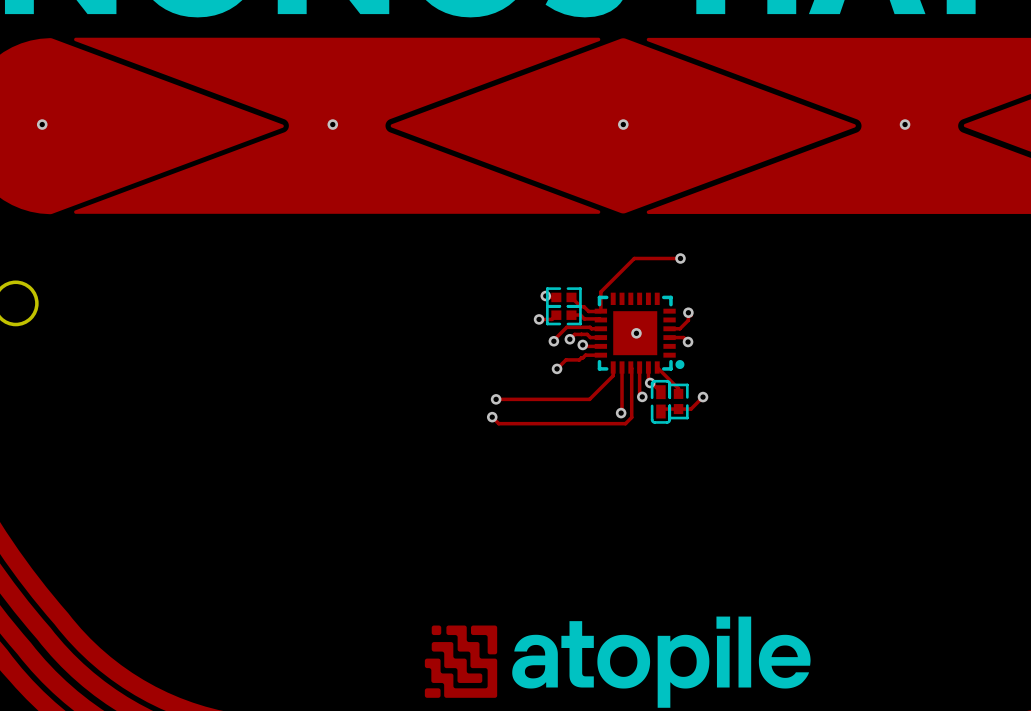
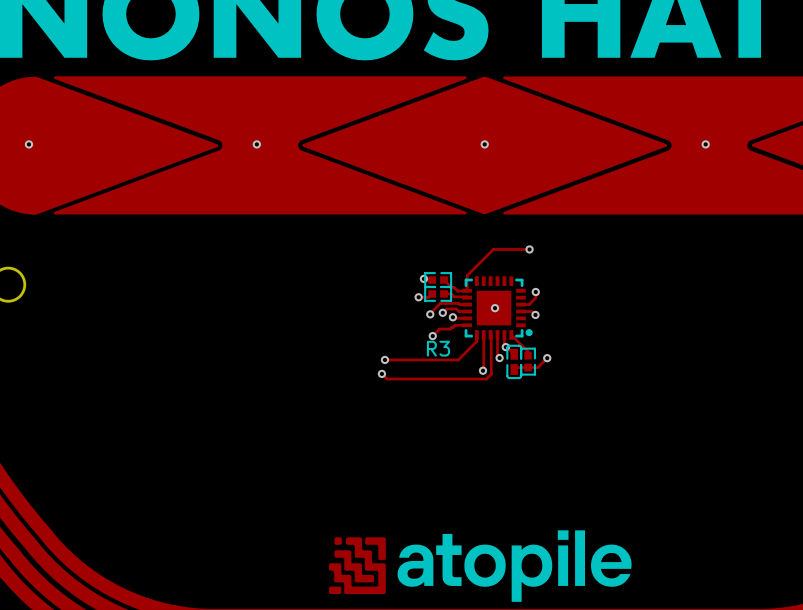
R3 name: none -> R3 (438, 348)

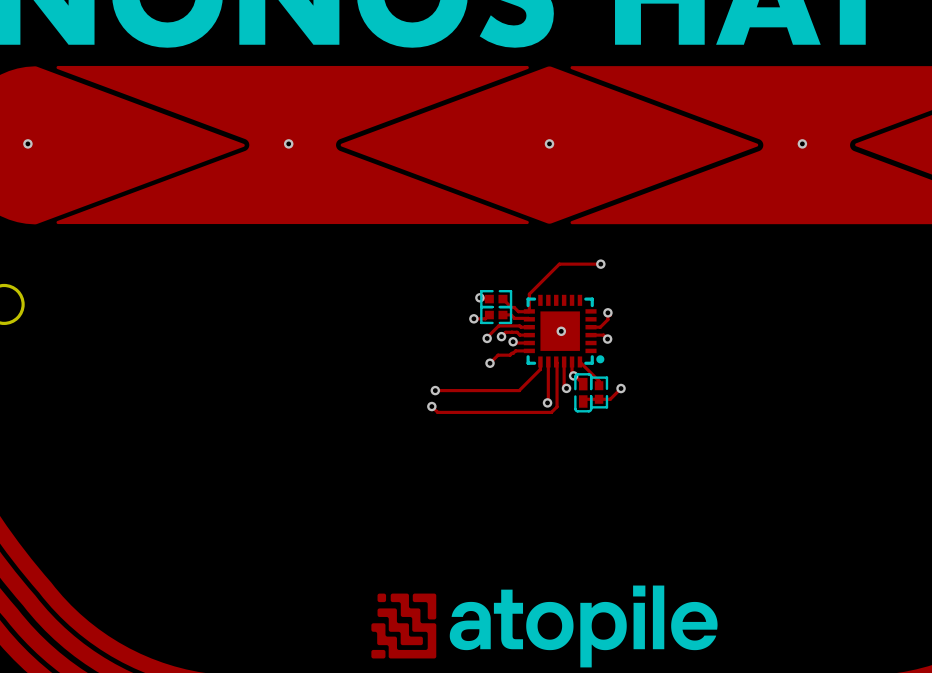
R3 name: R3 (438, 348) -> none

